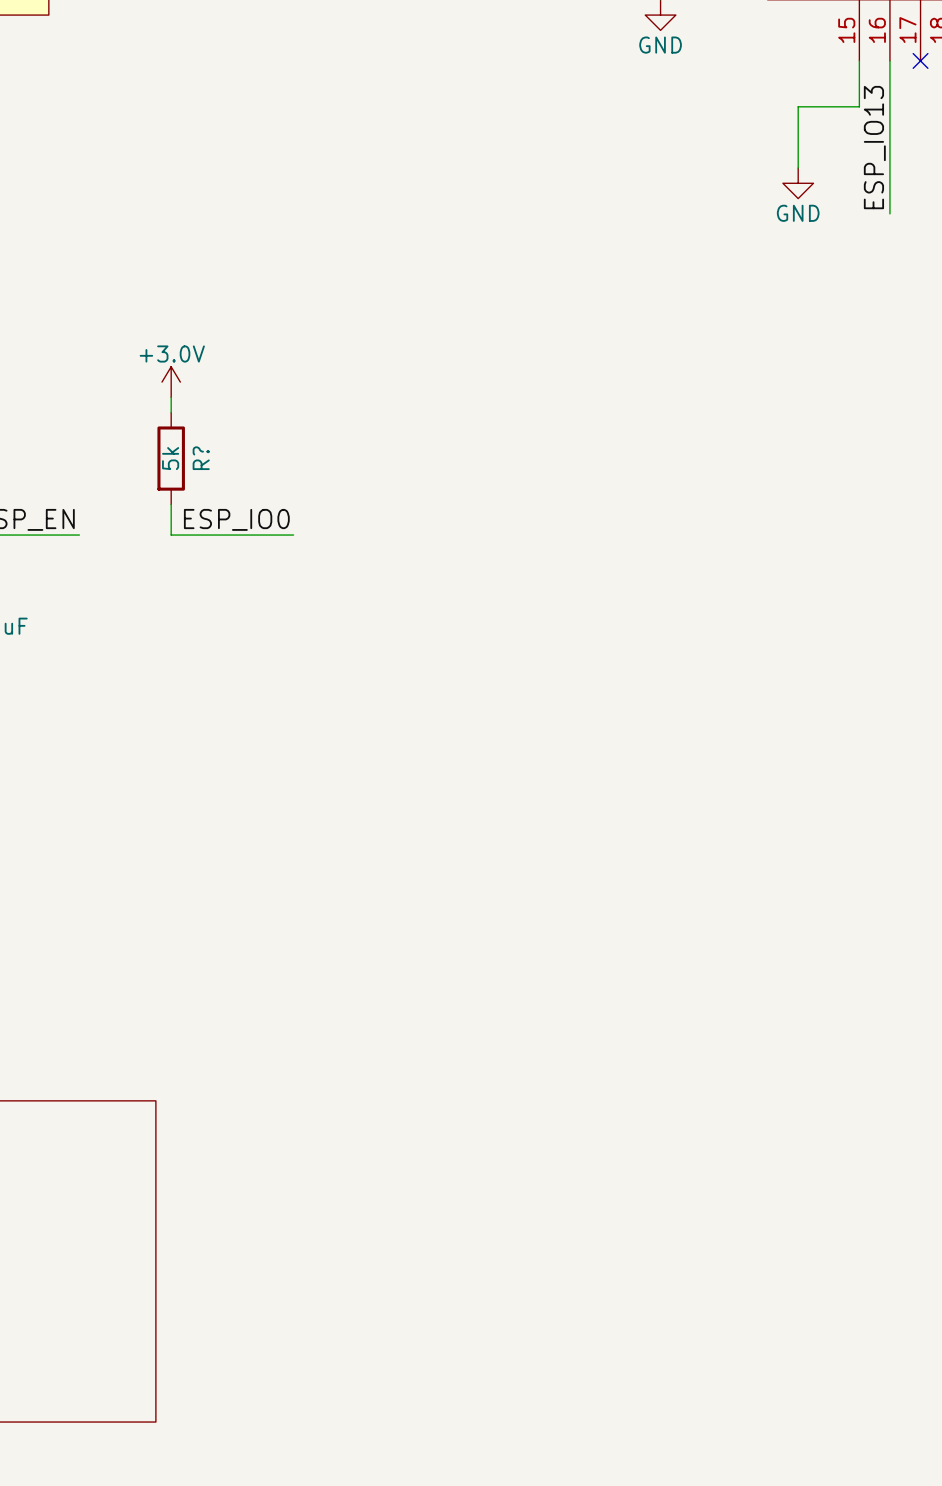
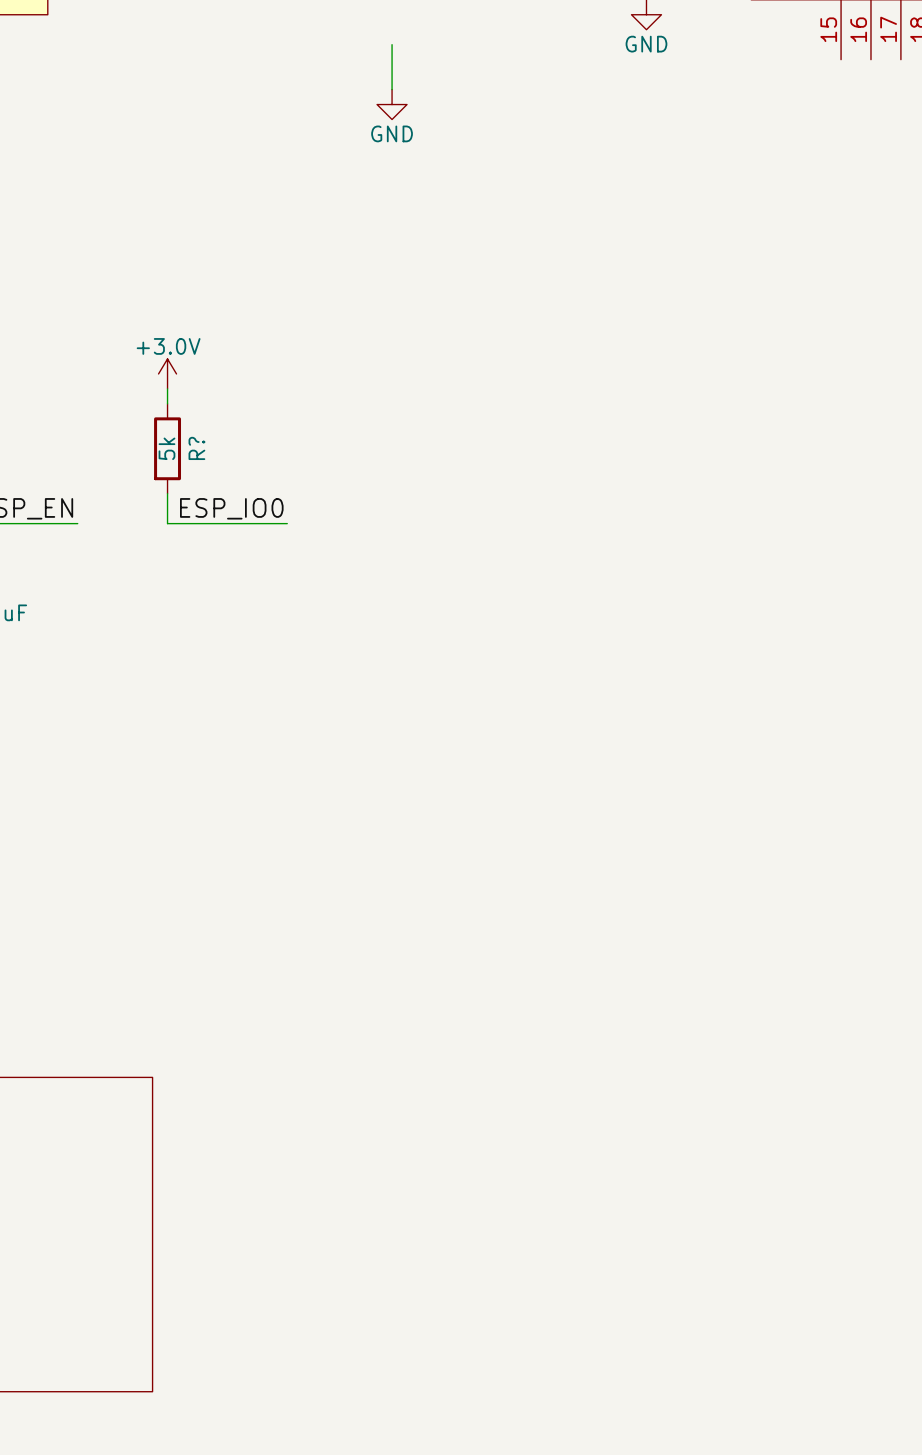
wire: none -> (392, 44) (392, 89)
wire: (859, 60) (859, 106) (798, 106) (798, 167) -> none
wire: (889, 60) (889, 213) -> none
no-connect mark: (920, 60) -> none
power symbol: none -> GND (392, 104)
label: ESP_IO13 (874, 147) -> none
power symbol: GND (798, 183) -> none

